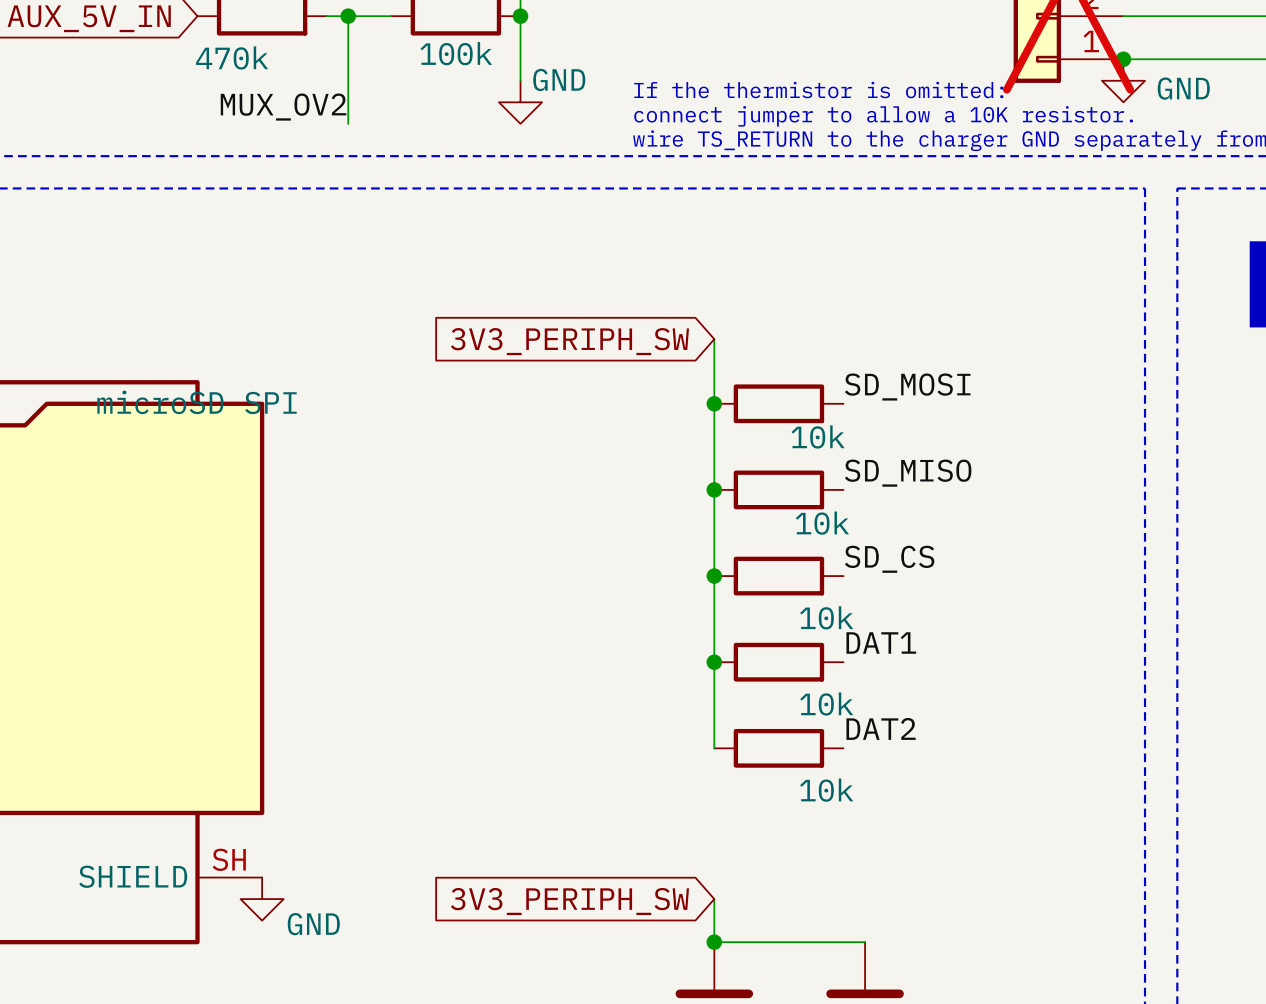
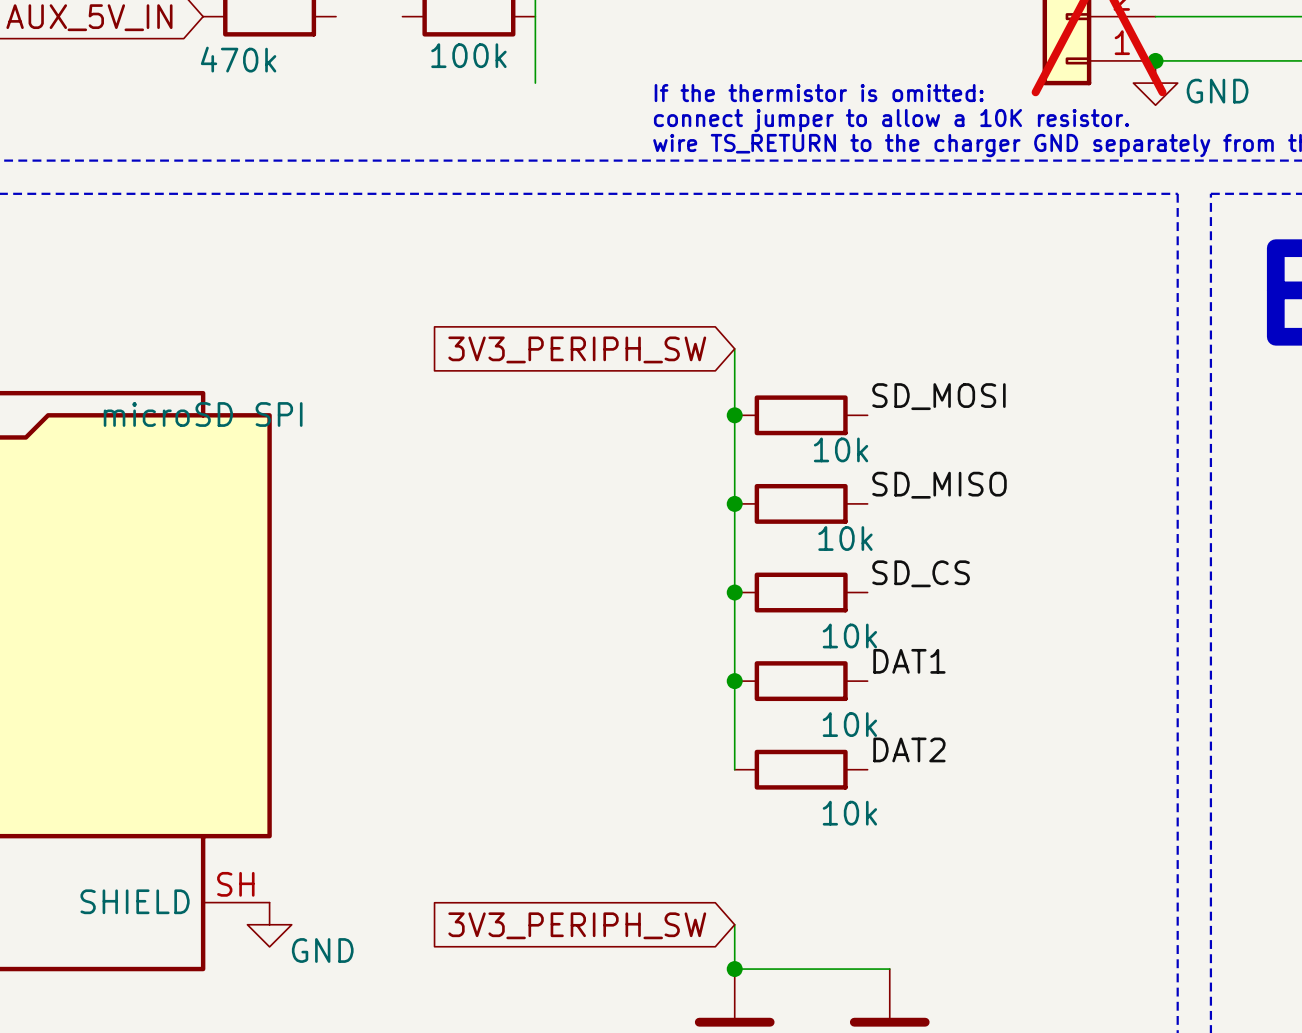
wire: (326, 16) (391, 16) -> none
wire: (348, 16) (348, 123) -> none
junction: (348, 16) -> none
junction: (520, 16) -> none
power symbol: GND (520, 102) -> none
label: MUX_OV2 (283, 107) -> none

